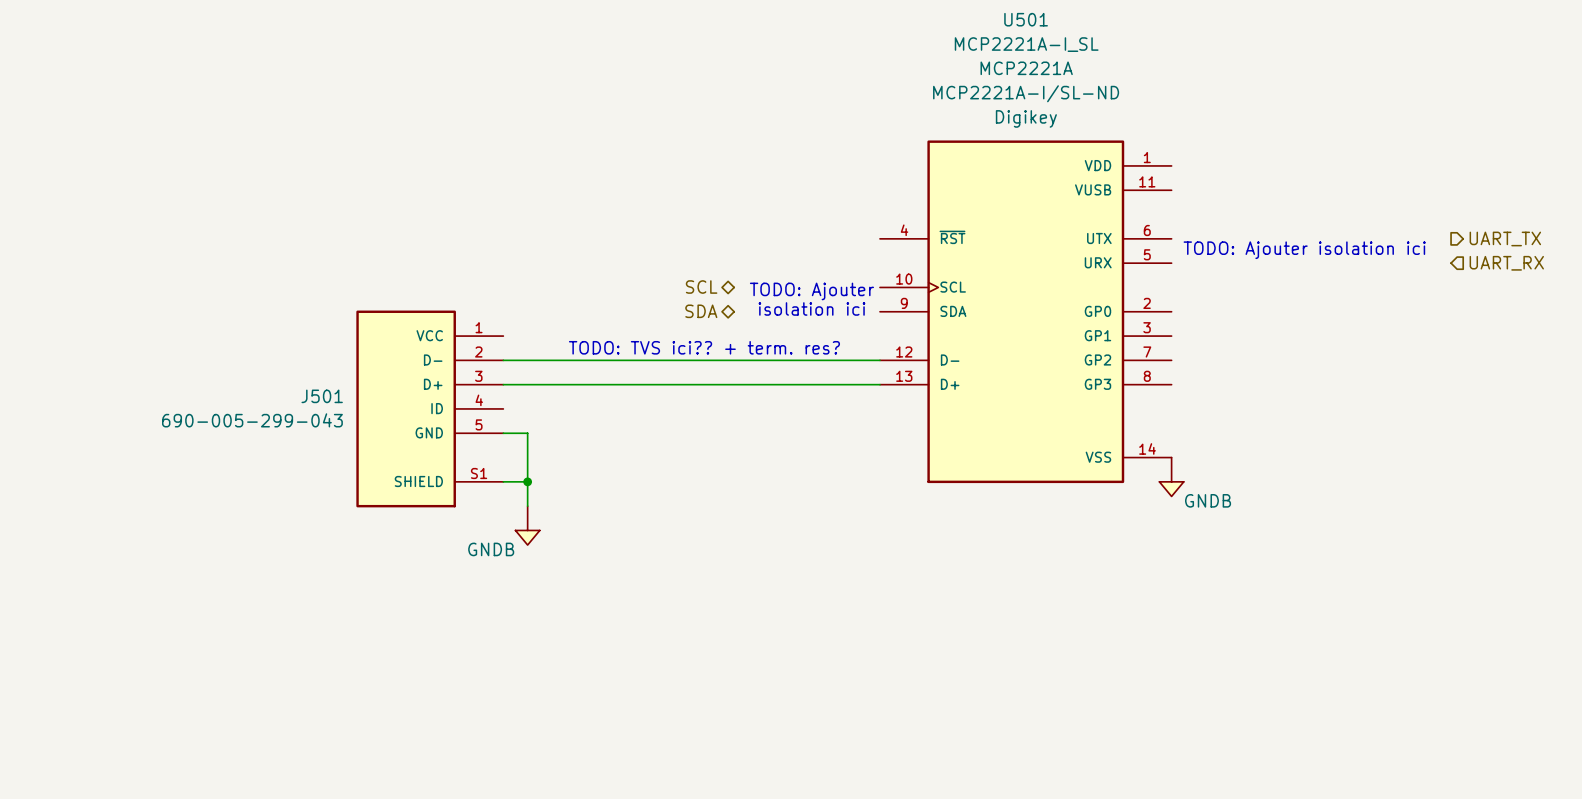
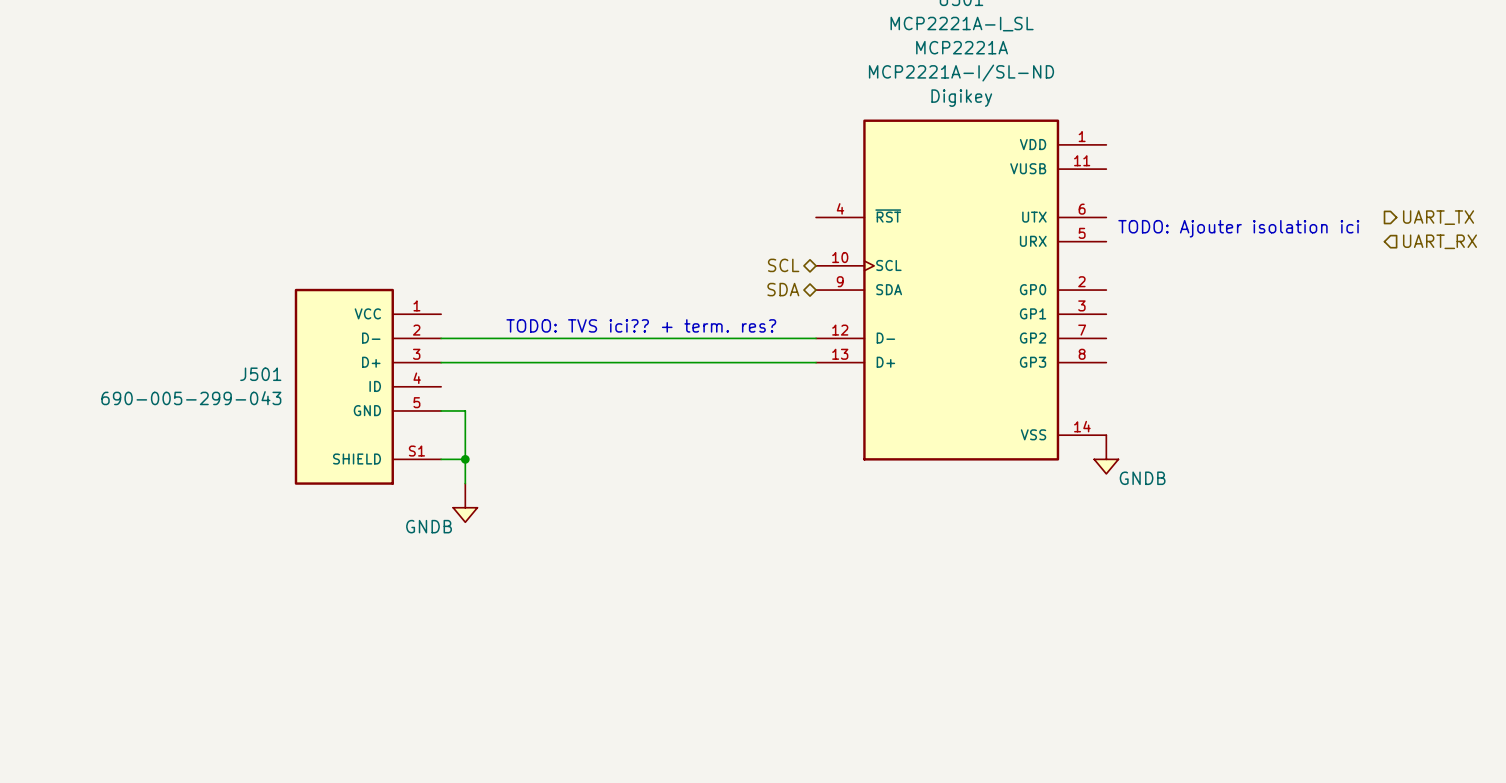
hierarchical label position: SCL (701, 287) -> SCL (783, 265)
text: TODO: Ajouter (811, 291) -> none
text: isolation ici (811, 308) -> none
hierarchical label position: SDA (701, 311) -> SDA (783, 289)

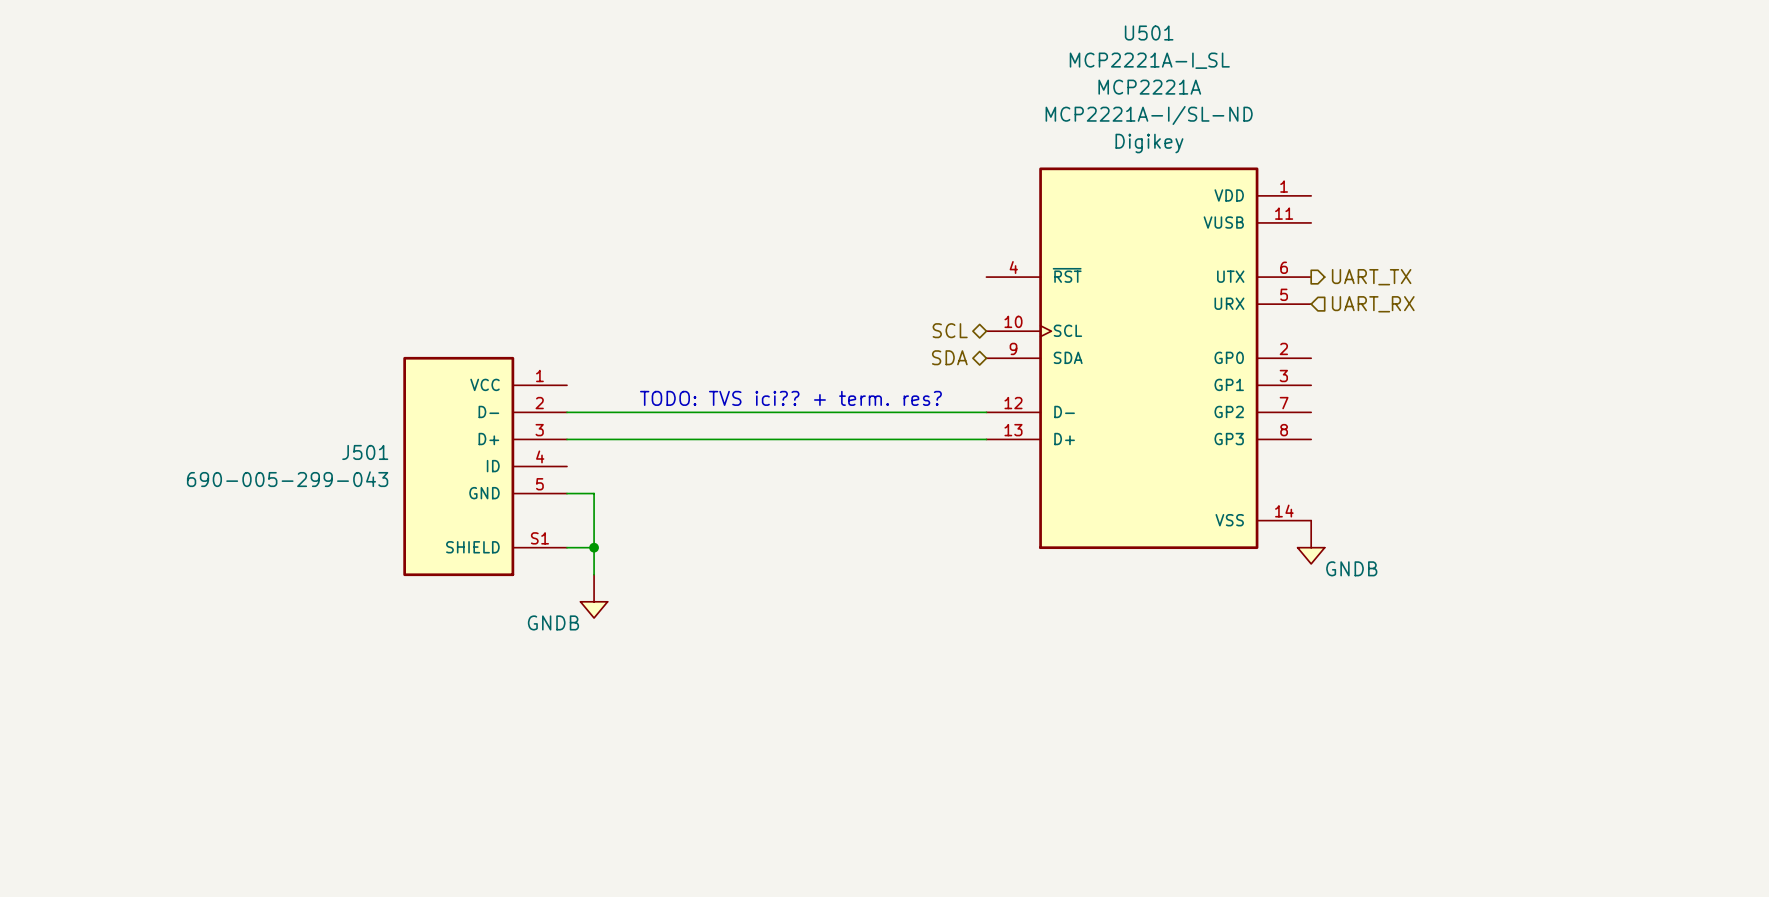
hierarchical label: none -> UART_TX (1371, 277)
hierarchical label: UART_TX (1438, 217) -> none
text: TODO: Ajouter isolation ici (1238, 228) -> none
hierarchical label: none -> UART_RX (1373, 304)
hierarchical label: UART_RX (1439, 241) -> none

